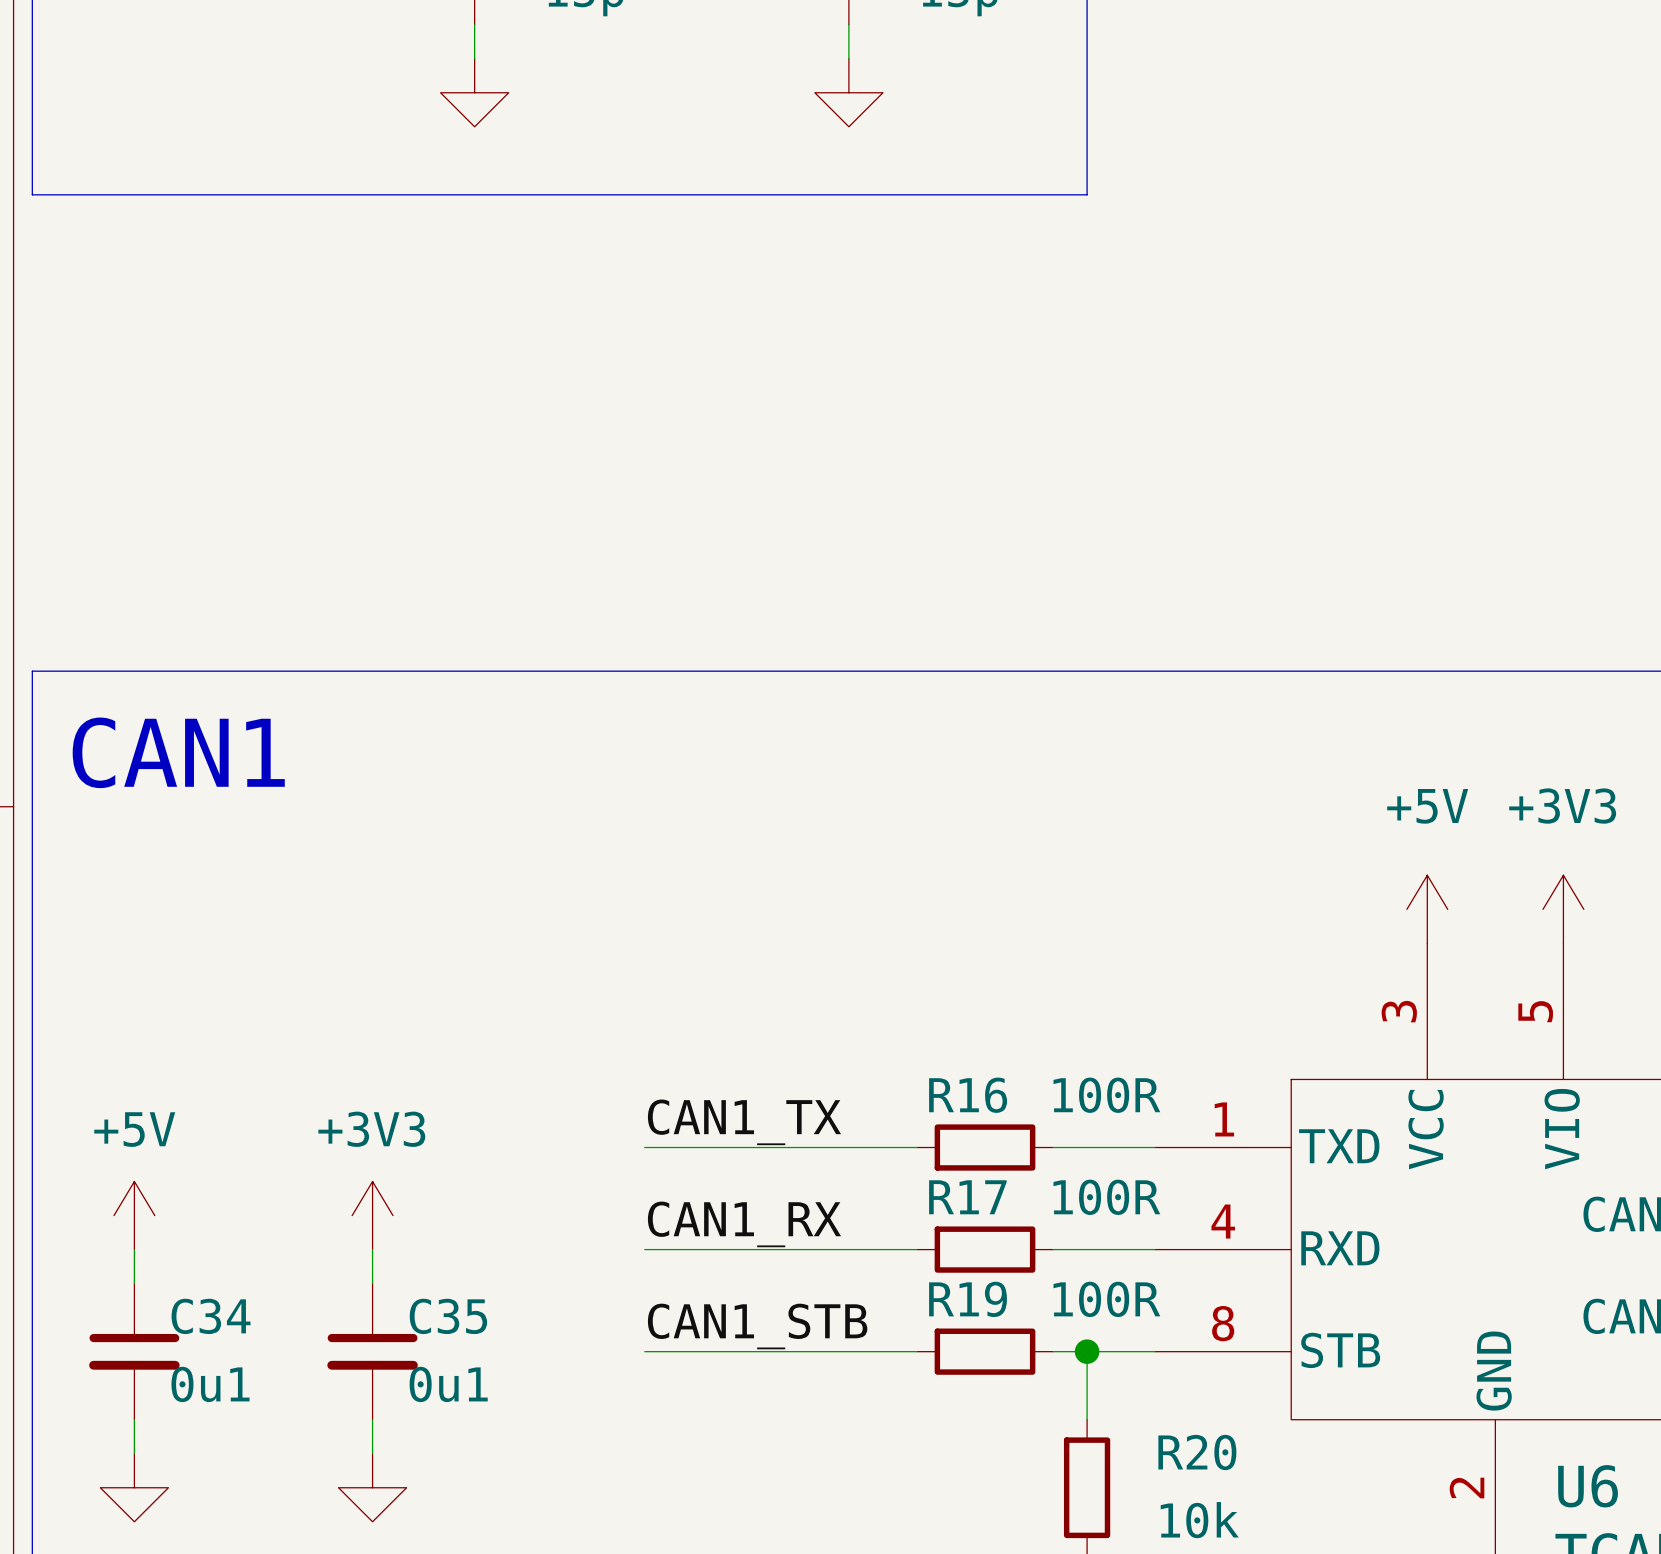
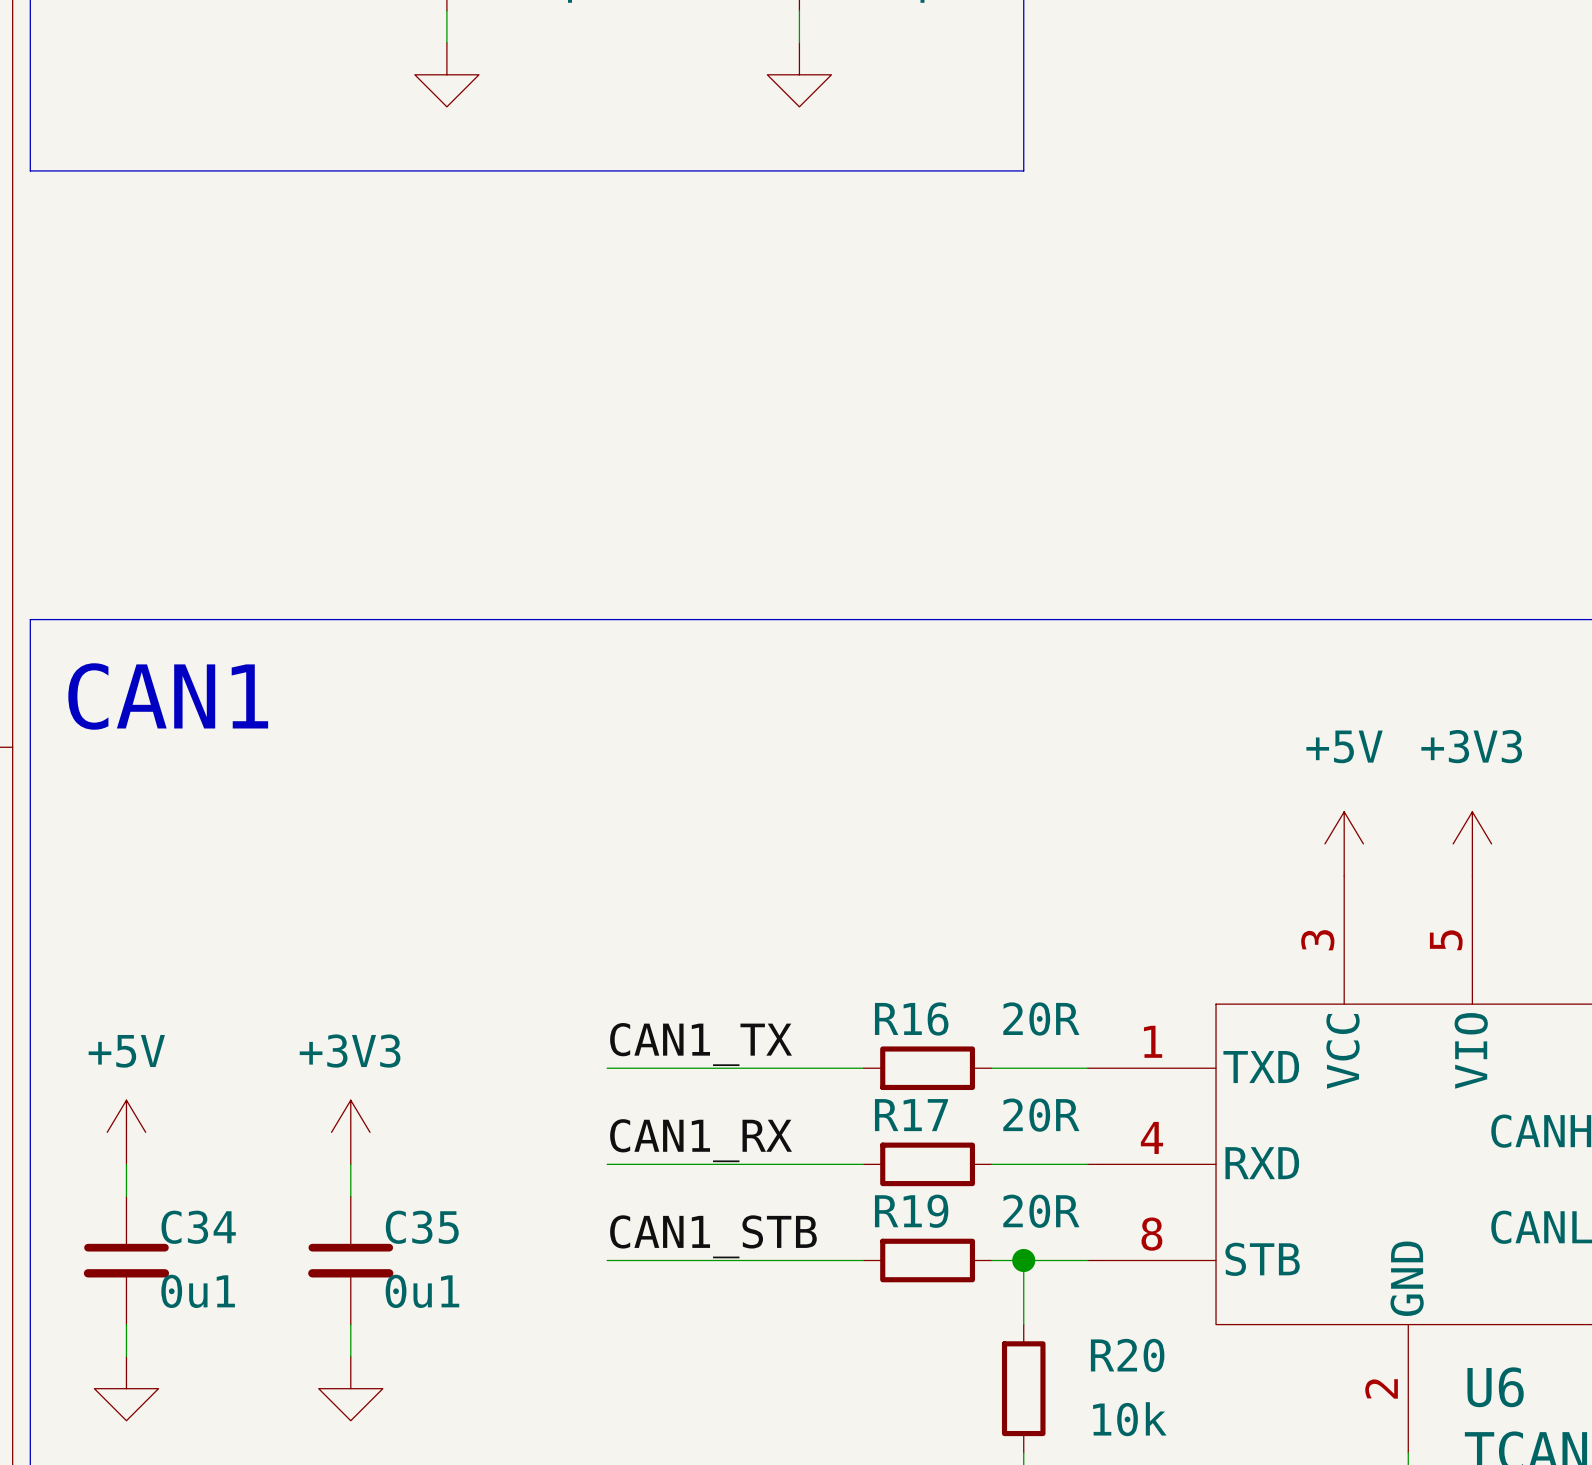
R16 value: 100R (1106, 1095) -> 20R (1041, 1018)
R17 value: 100R (1106, 1197) -> 20R (1041, 1115)
R19 value: 100R (1106, 1299) -> 20R (1041, 1211)

